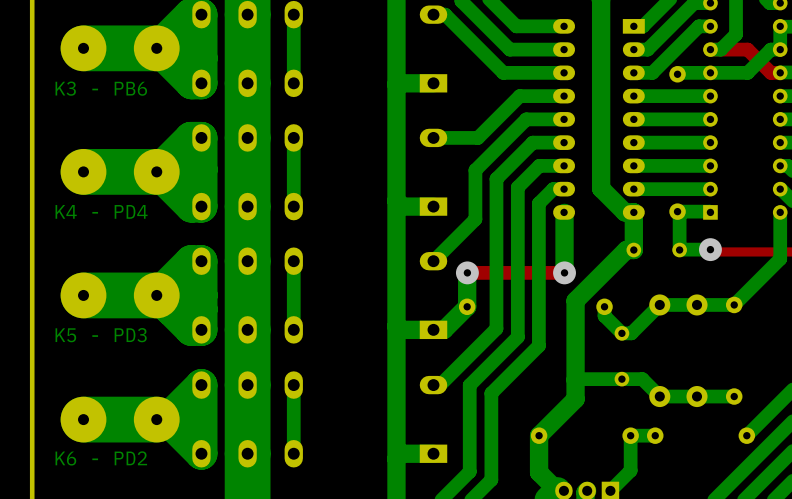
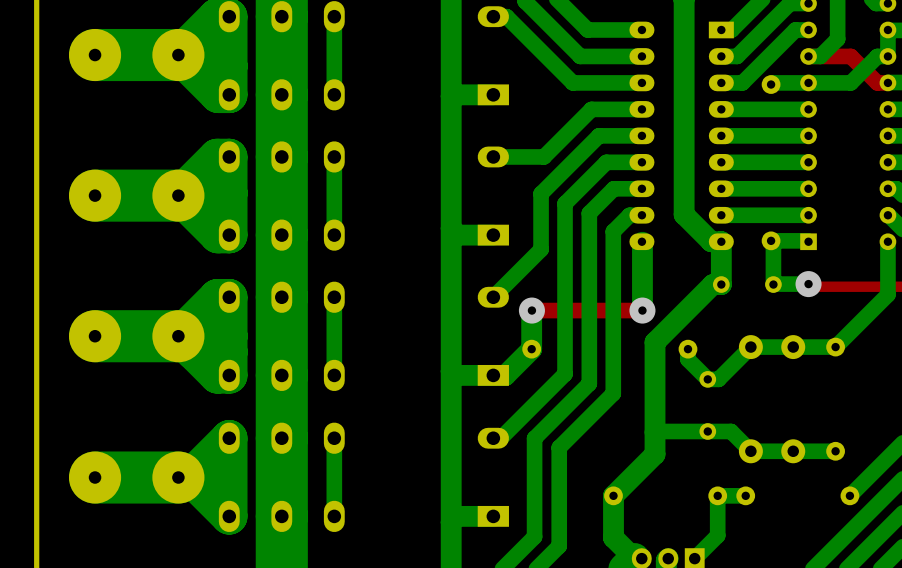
text: K3 - PB6 (101, 88) -> none
text: K4 - PD4 (101, 211) -> none
text: K5 - PD3 (101, 335) -> none
text: K6 - PD2 (101, 458) -> none

